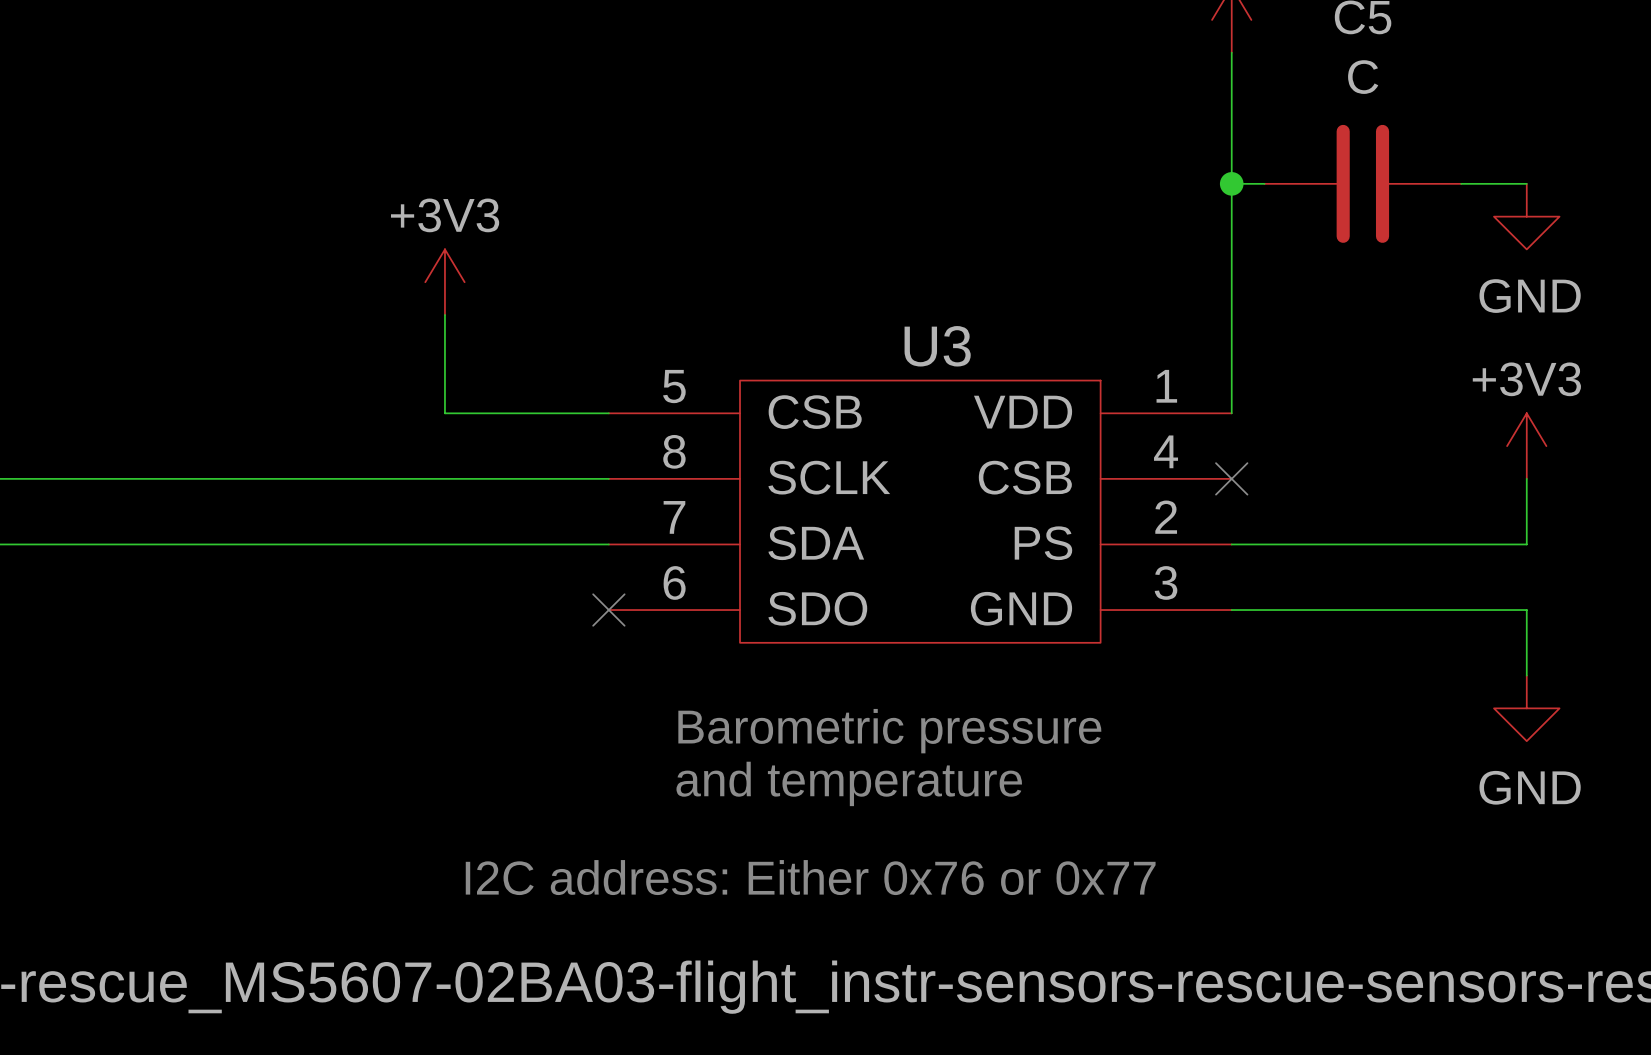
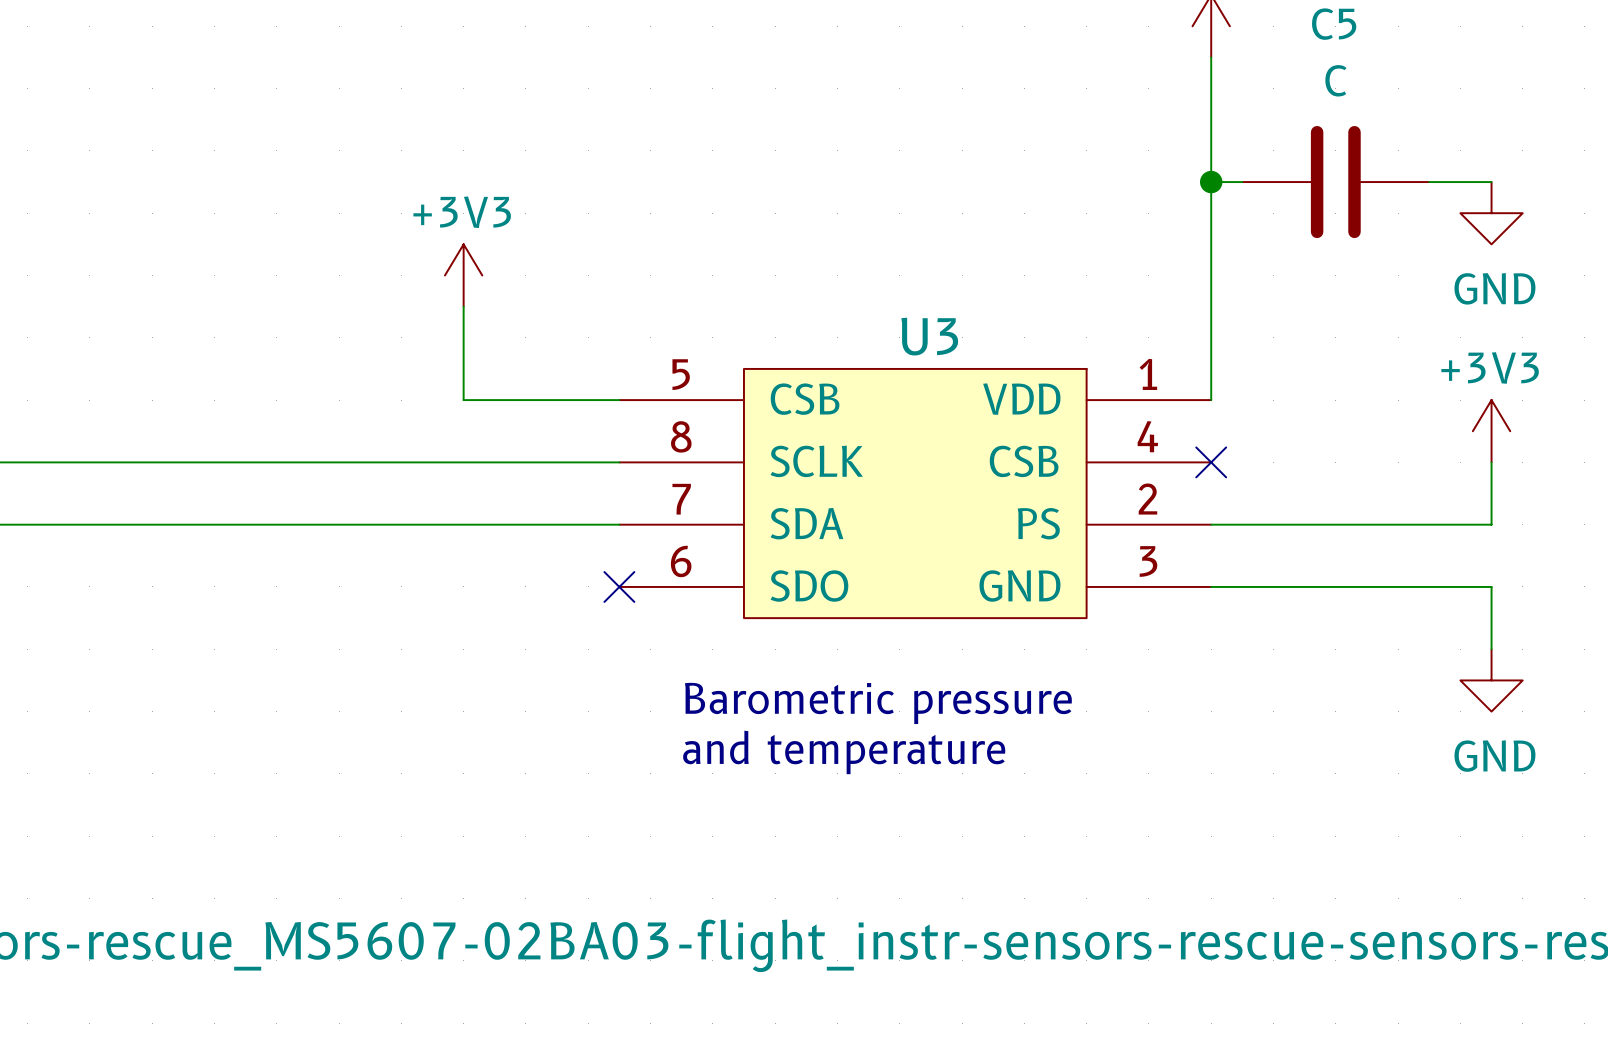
text: I2C address: Either 0x76 or 0x77 (810, 877) -> none

